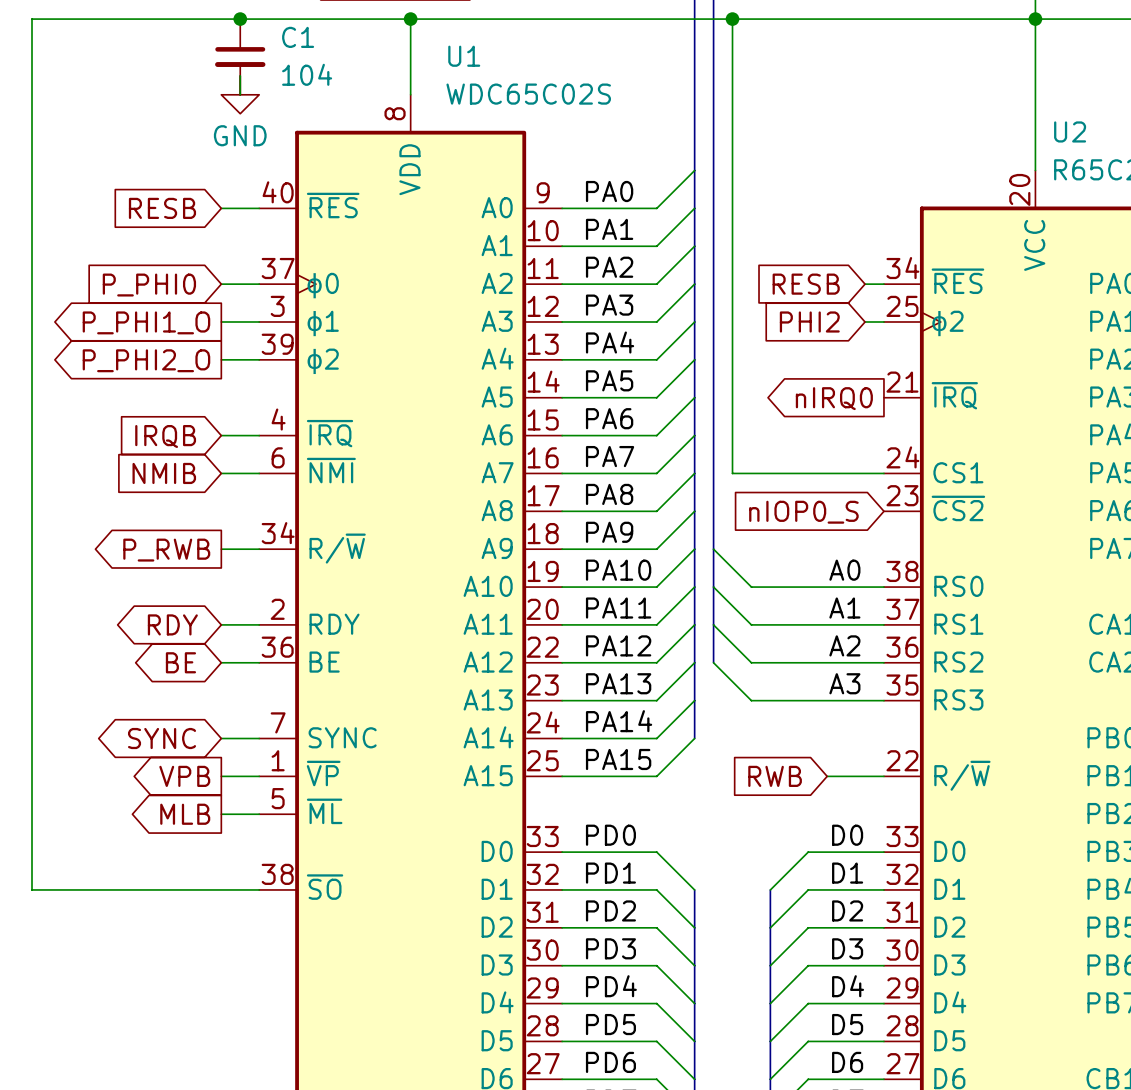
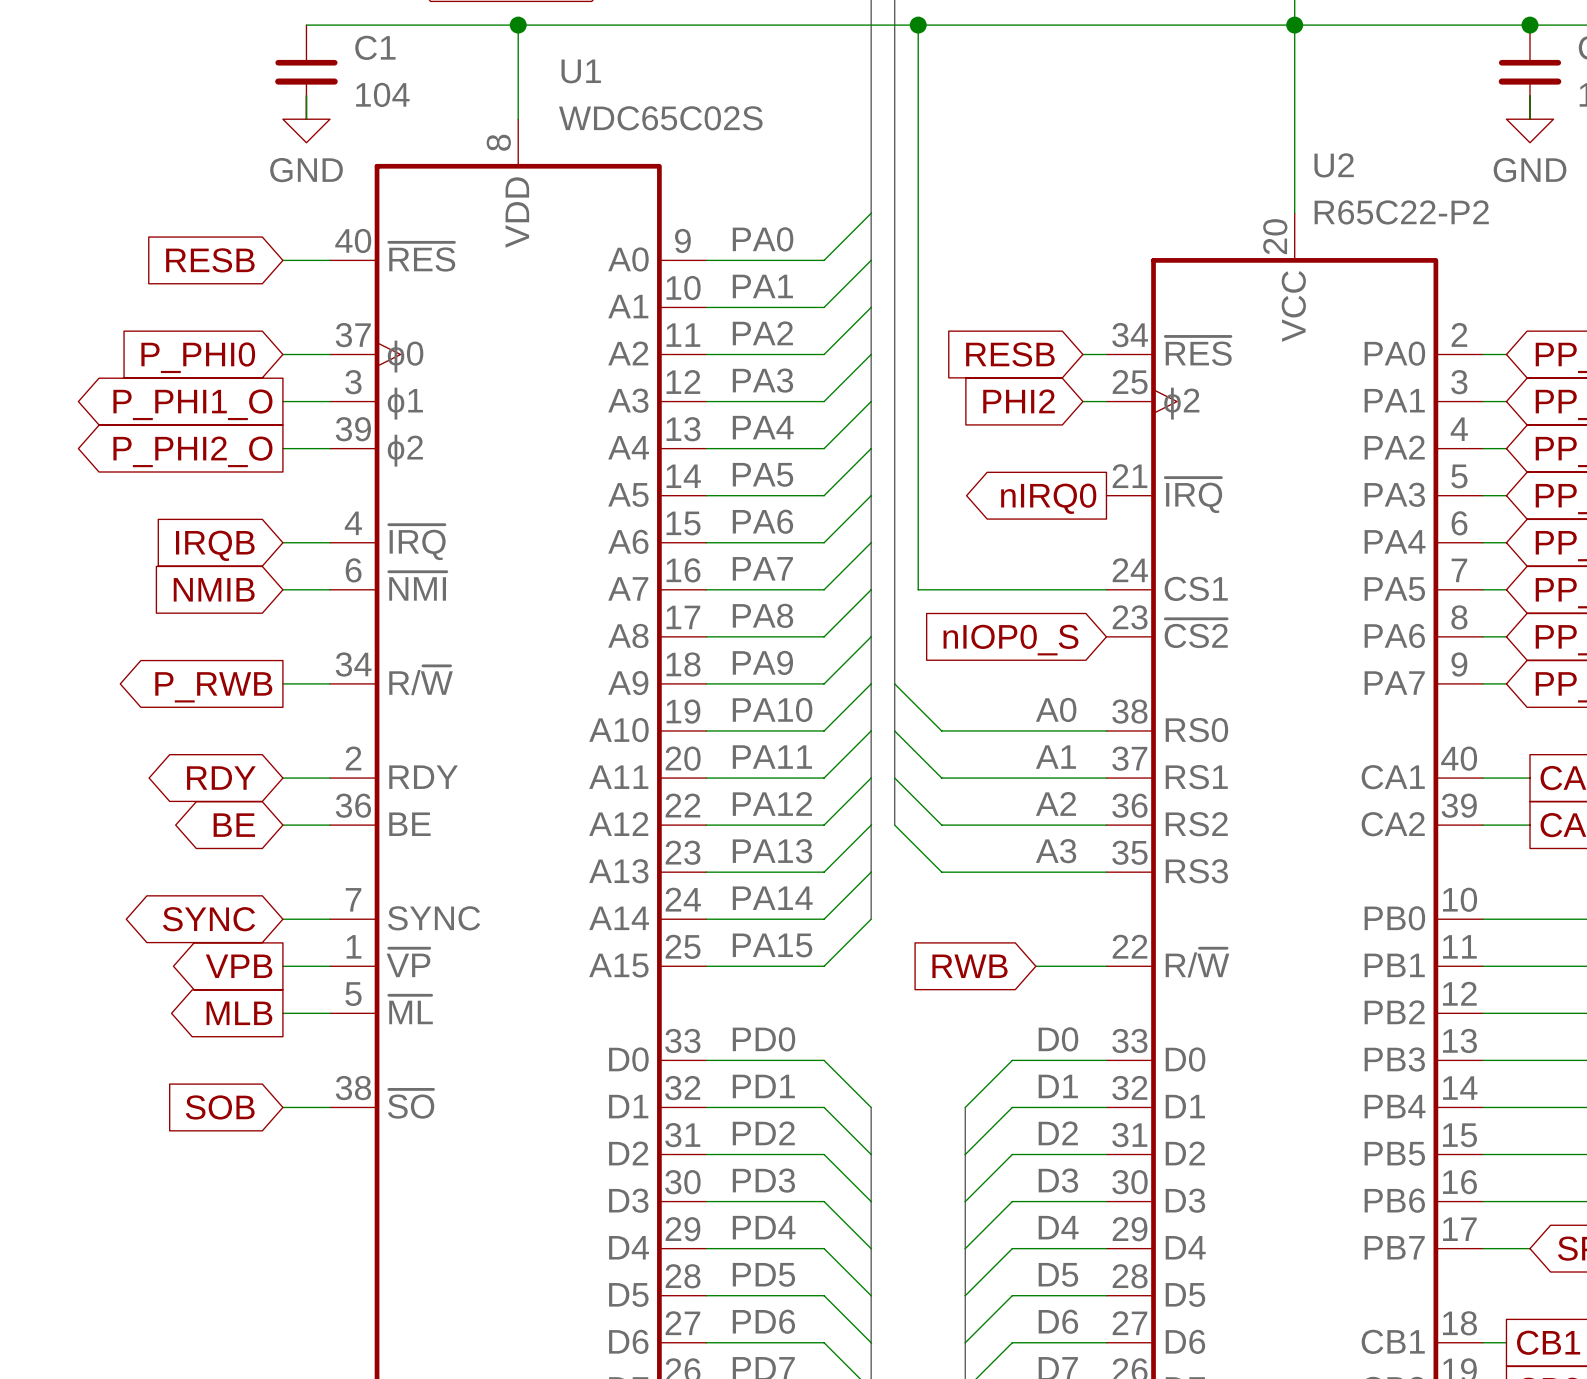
wire: (240, 19) (32, 19) (32, 889) (221, 889) -> none
junction: (240, 19) -> none
global label: none -> SOB (220, 1107)

